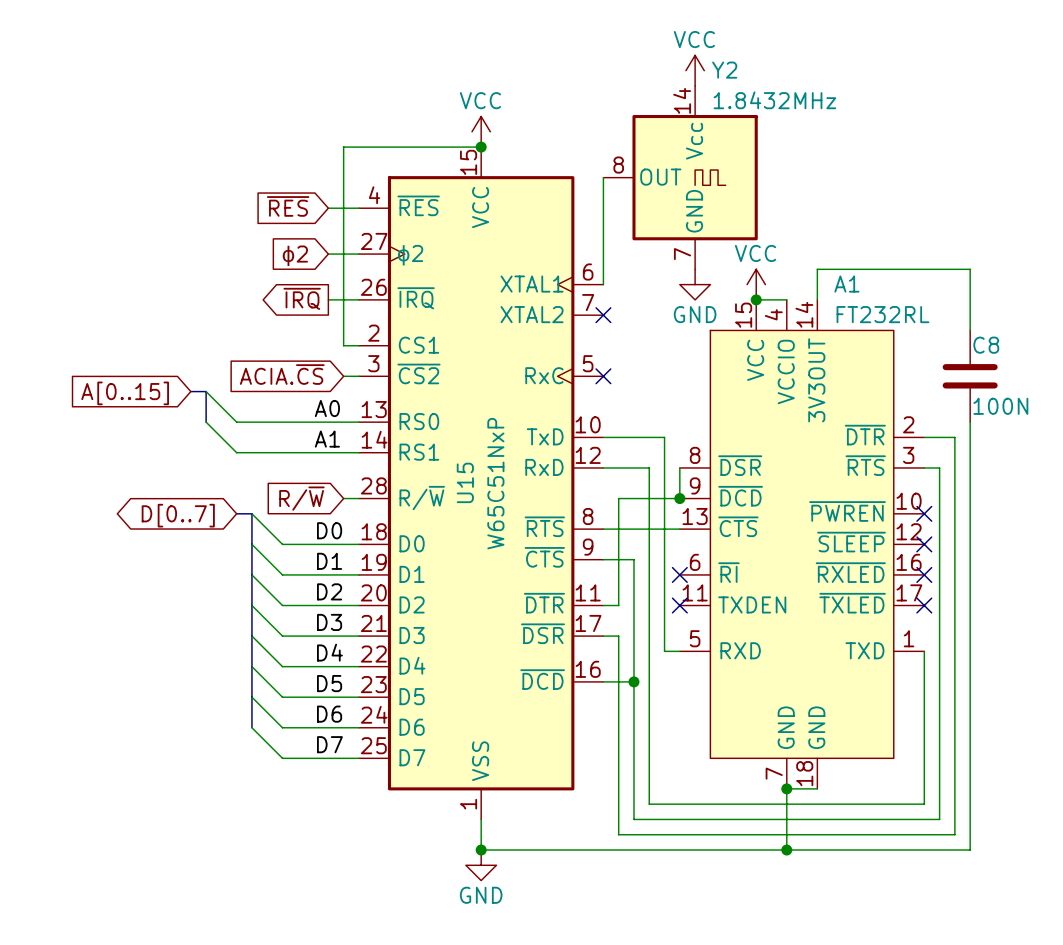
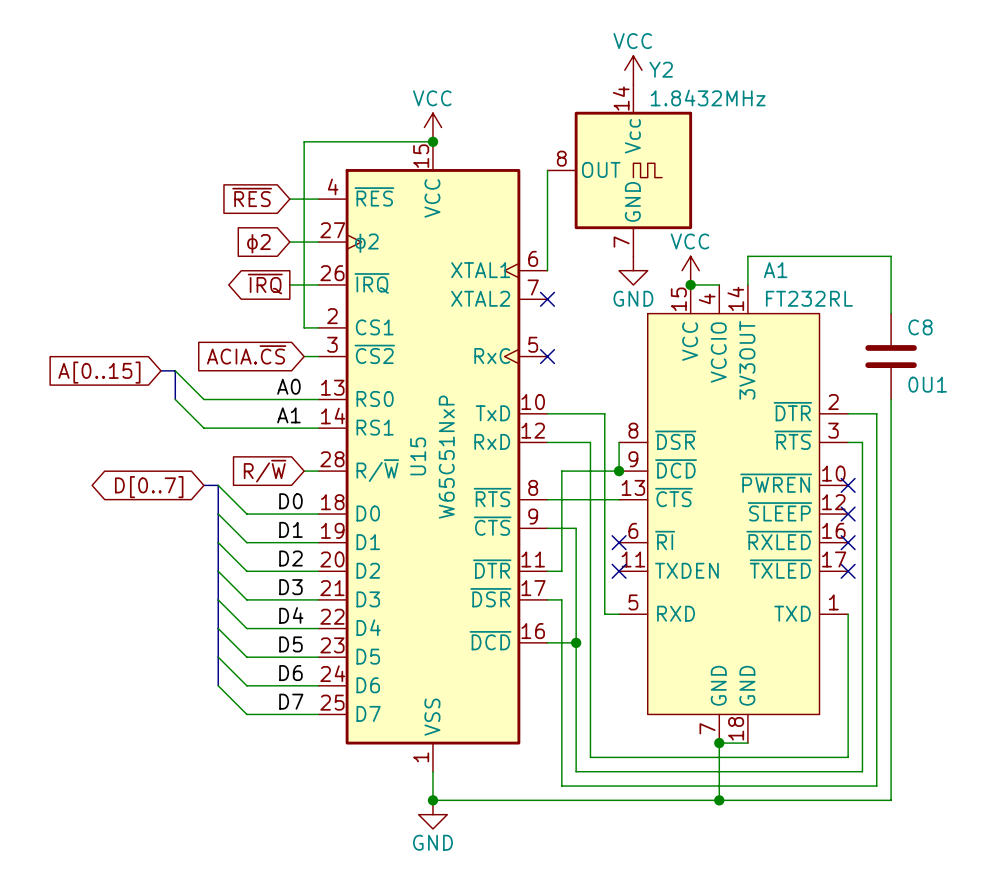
C8 name position: C8 (986, 345) -> C8 (920, 327)
C8 value: 100N (1000, 406) -> 0U1 (927, 384)

